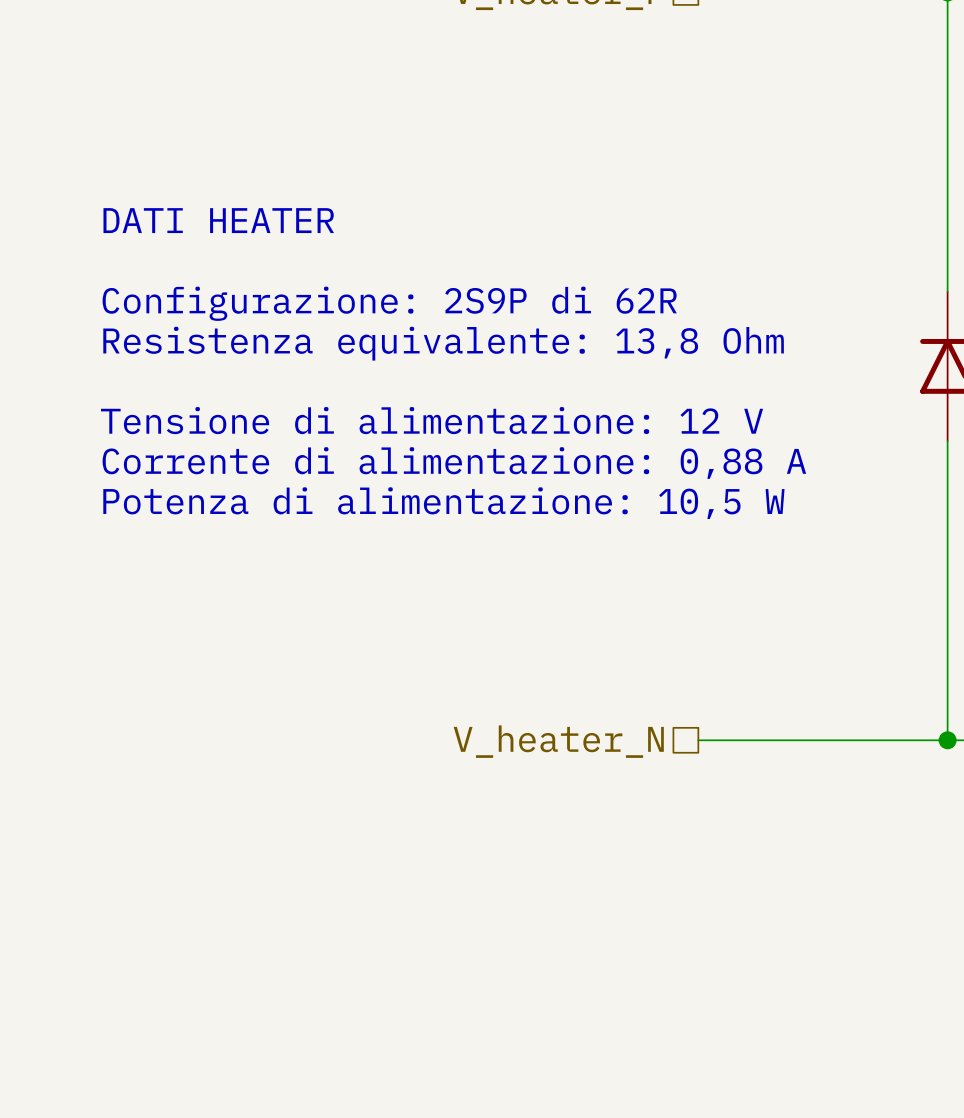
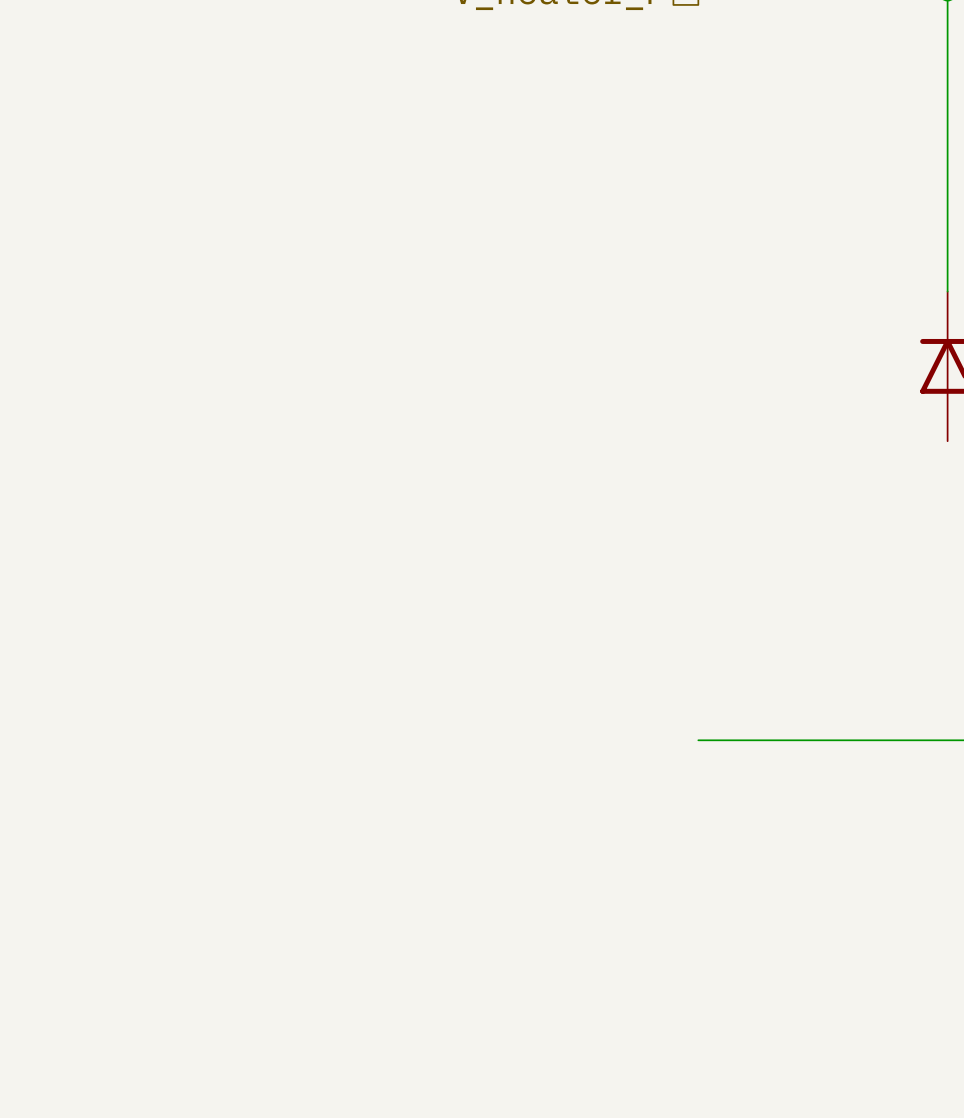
text: DATI HEATER (218, 220) -> none
text: Configurazione: 2S9P di 62R (389, 303) -> none
text: Resistenza equivalente: 13,8 Ohm (443, 343) -> none
text: Tensione di alimentazione: 12 V (432, 420) -> none
wire: (947, 441) (947, 740) -> none
text: Corrente di alimentazione: 0,88 A (454, 463) -> none
text: Potenza di alimentazione: 10,5 W (443, 503) -> none
junction: (947, 740) -> none
hierarchical label: V_heater_N (558, 741) -> none

